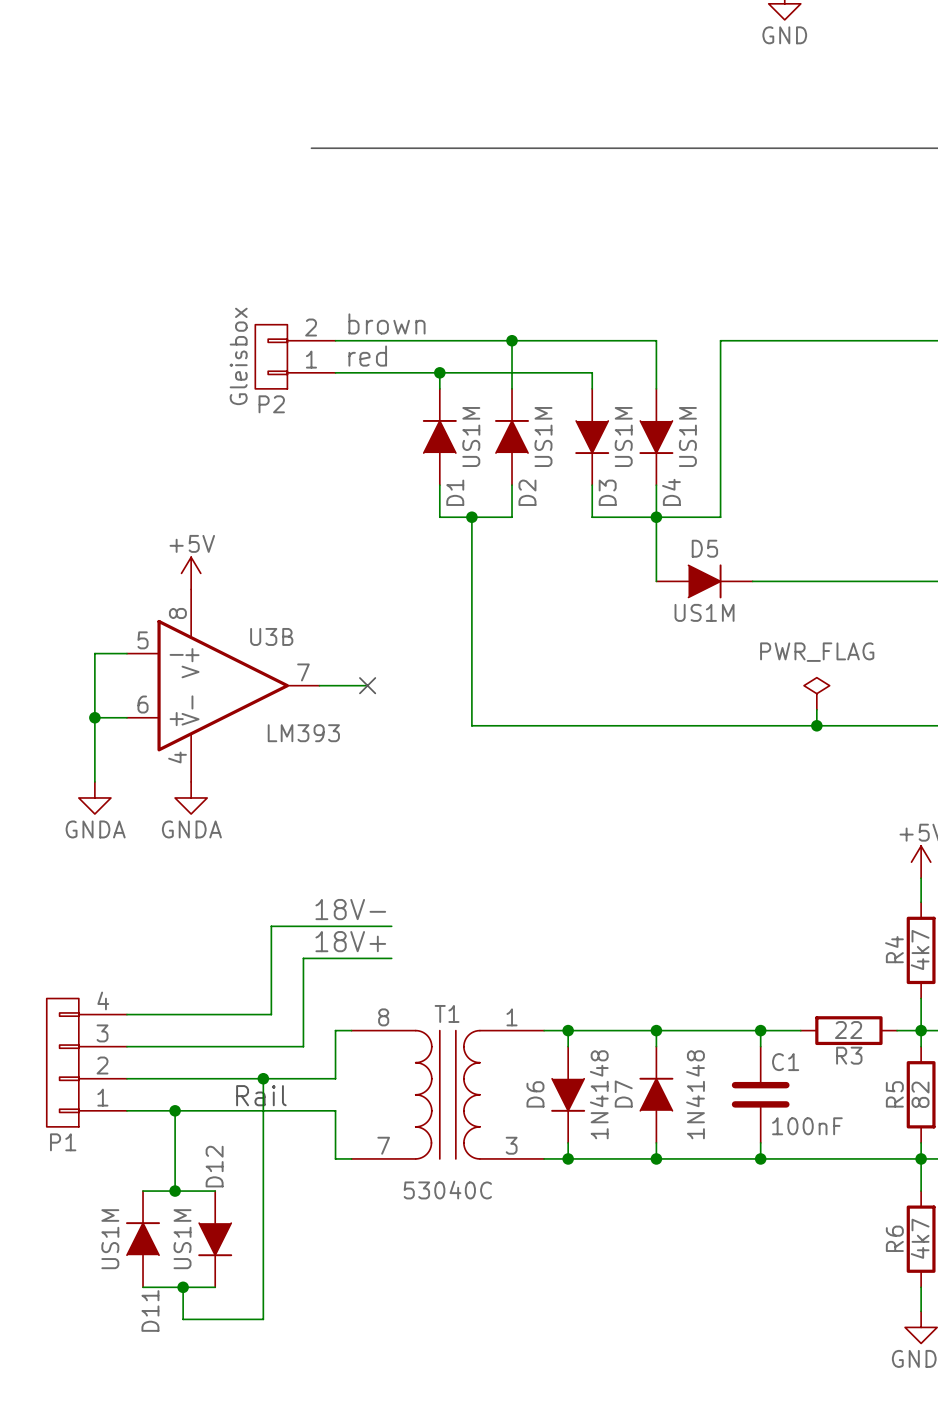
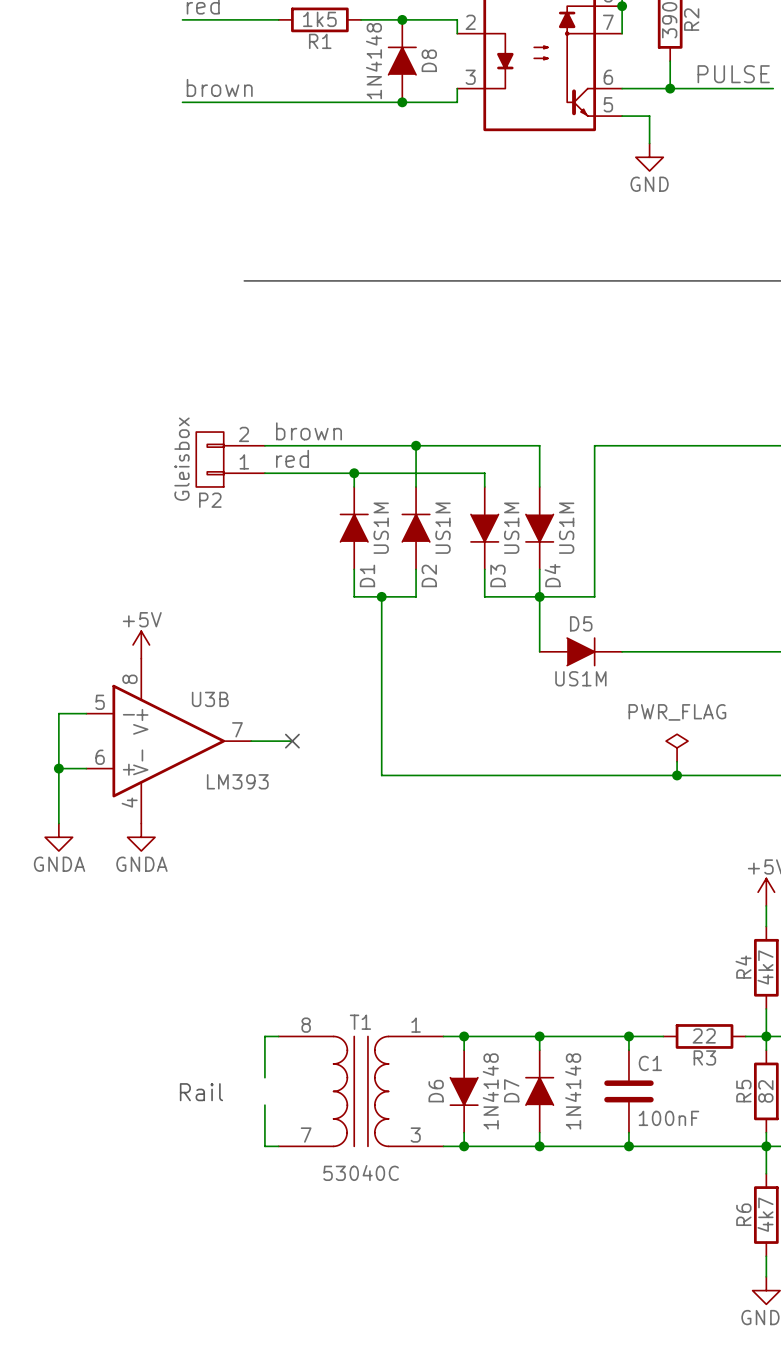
label: 18V- (350, 909) -> none
wire: (391, 926) (271, 926) (271, 1014) (126, 1014) -> none
label: 18V+ (350, 941) -> none
wire: (391, 958) (303, 958) (303, 1046) (126, 1046) -> none
P1: (86, 1062) -> none
wire: (126, 1078) (335, 1078) -> none
wire: (263, 1078) (263, 1319) (183, 1319) (183, 1287) -> none
junction: (263, 1078) -> none
wire: (126, 1110) (335, 1110) -> none
wire: (175, 1110) (175, 1191) -> none
junction: (175, 1110) -> none
wire: (143, 1191) (215, 1191) -> none
junction: (175, 1191) -> none
D11: US1M (143, 1239) -> none
D12: US1M (215, 1239) -> none
wire: (143, 1287) (215, 1287) -> none
junction: (183, 1287) -> none

